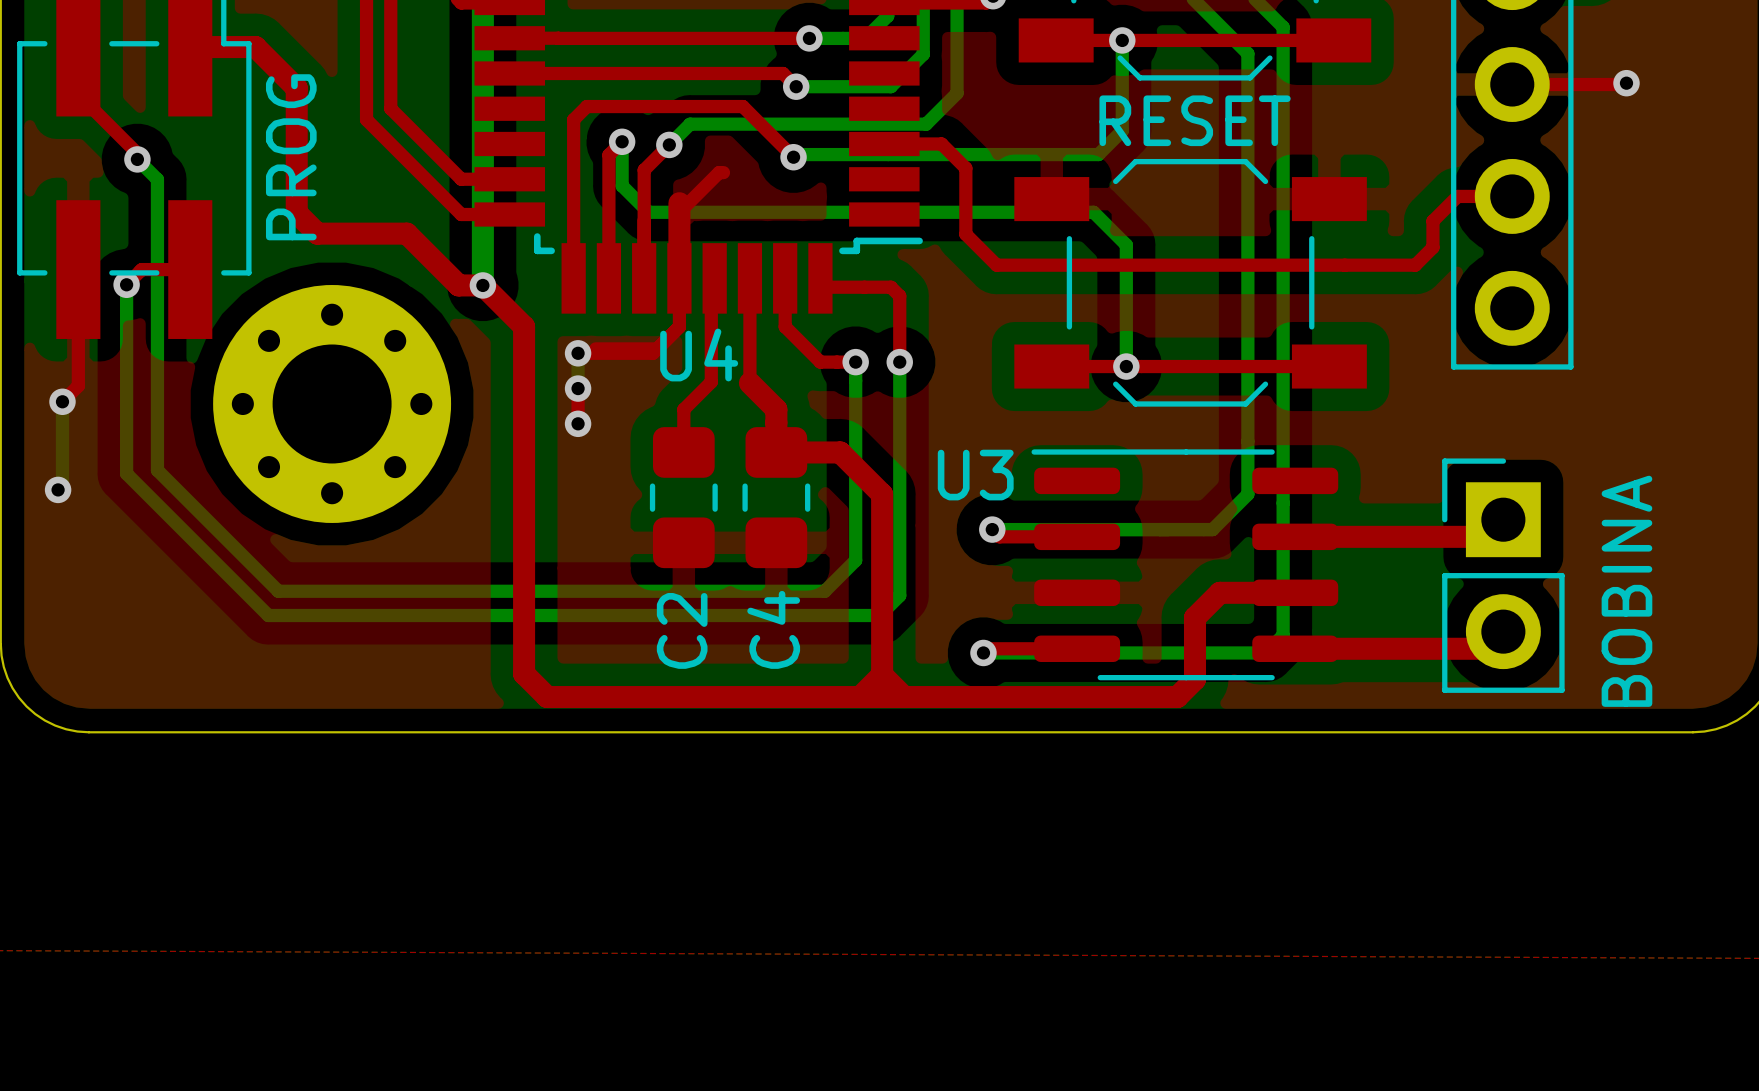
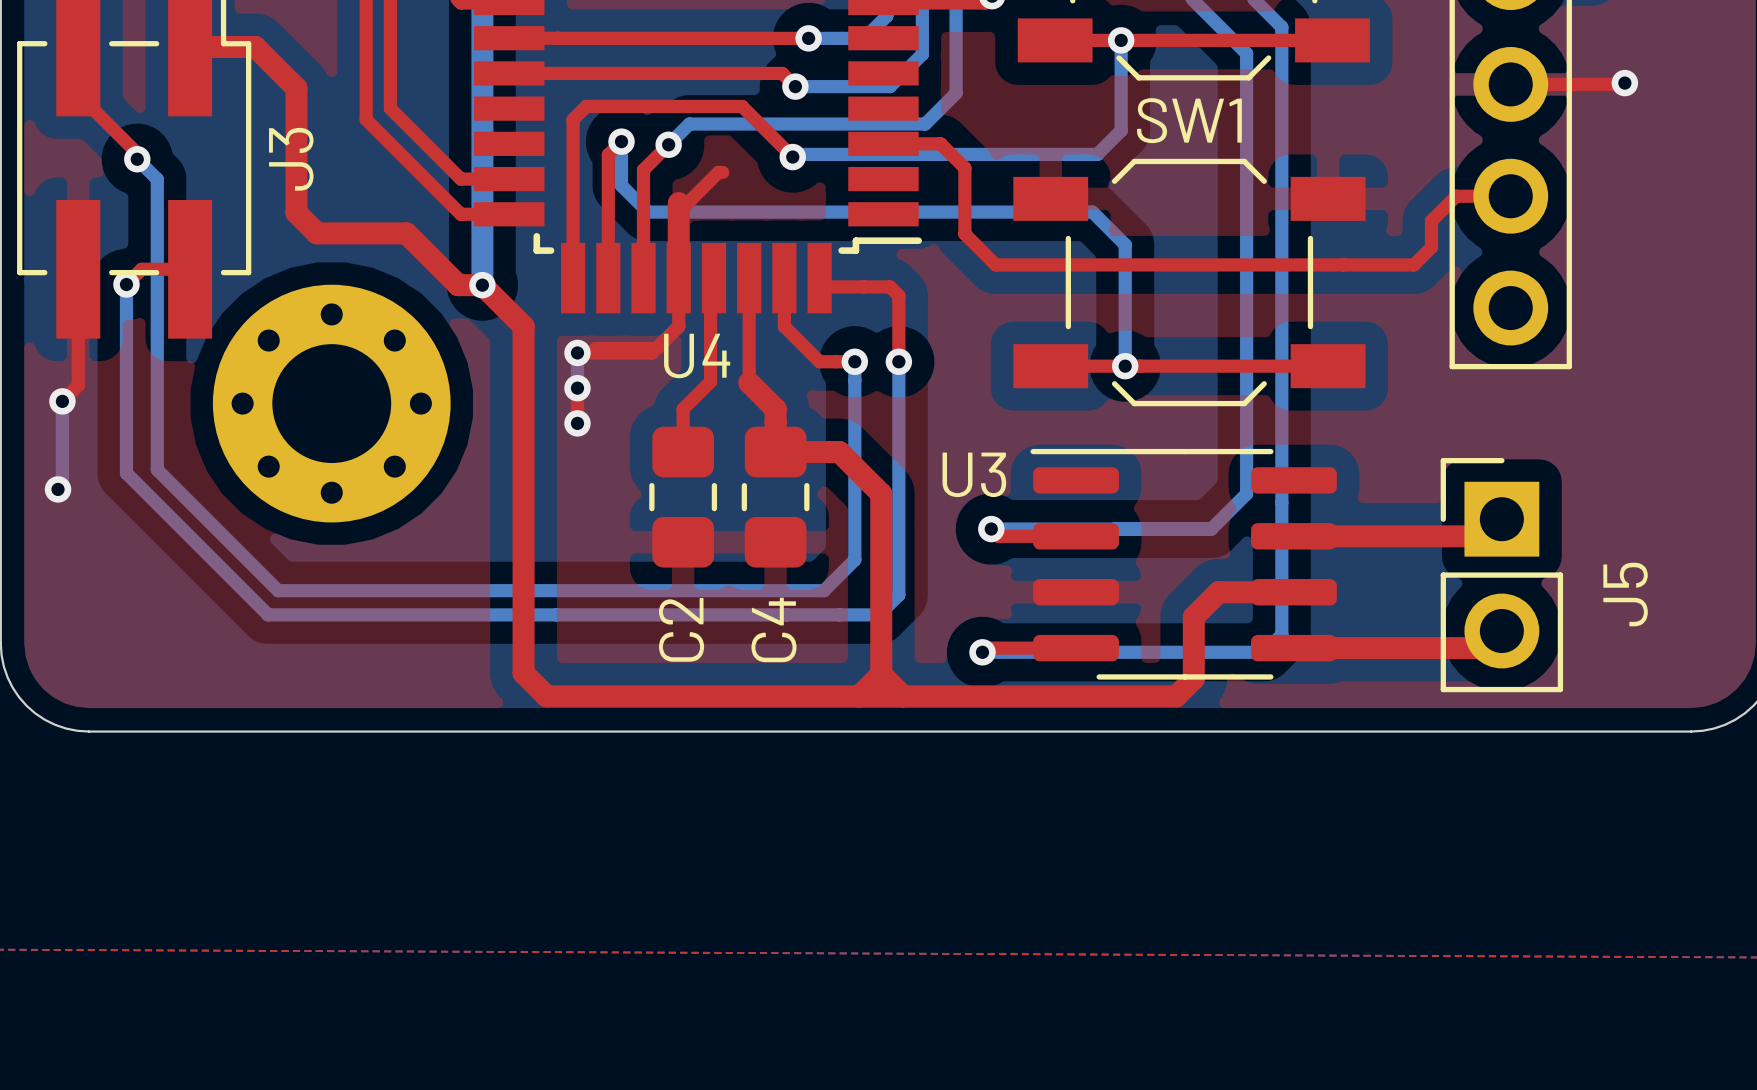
RESET name: RESET (1195, 120) -> SW1 (1189, 120)
PROG name: PROG (291, 157) -> J3 (291, 159)
BOBINA name: BOBINA (1626, 591) -> J5 (1625, 594)

